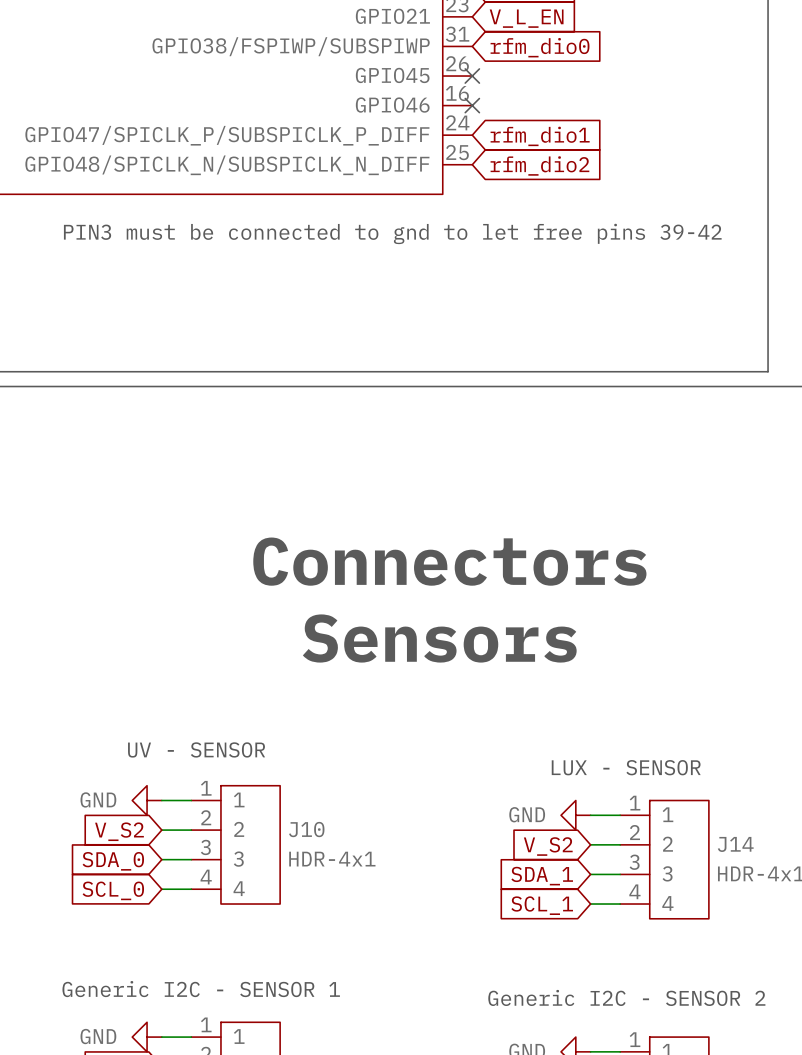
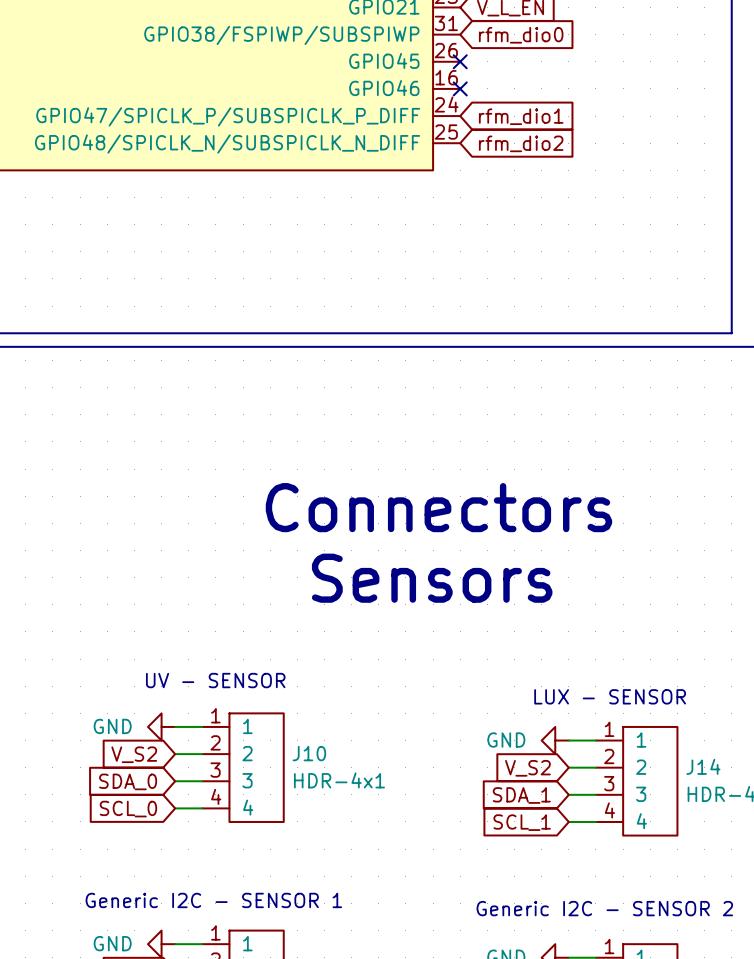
text: PIN3 must be connected to gnd to let free pins 39-42 (392, 233) -> none

